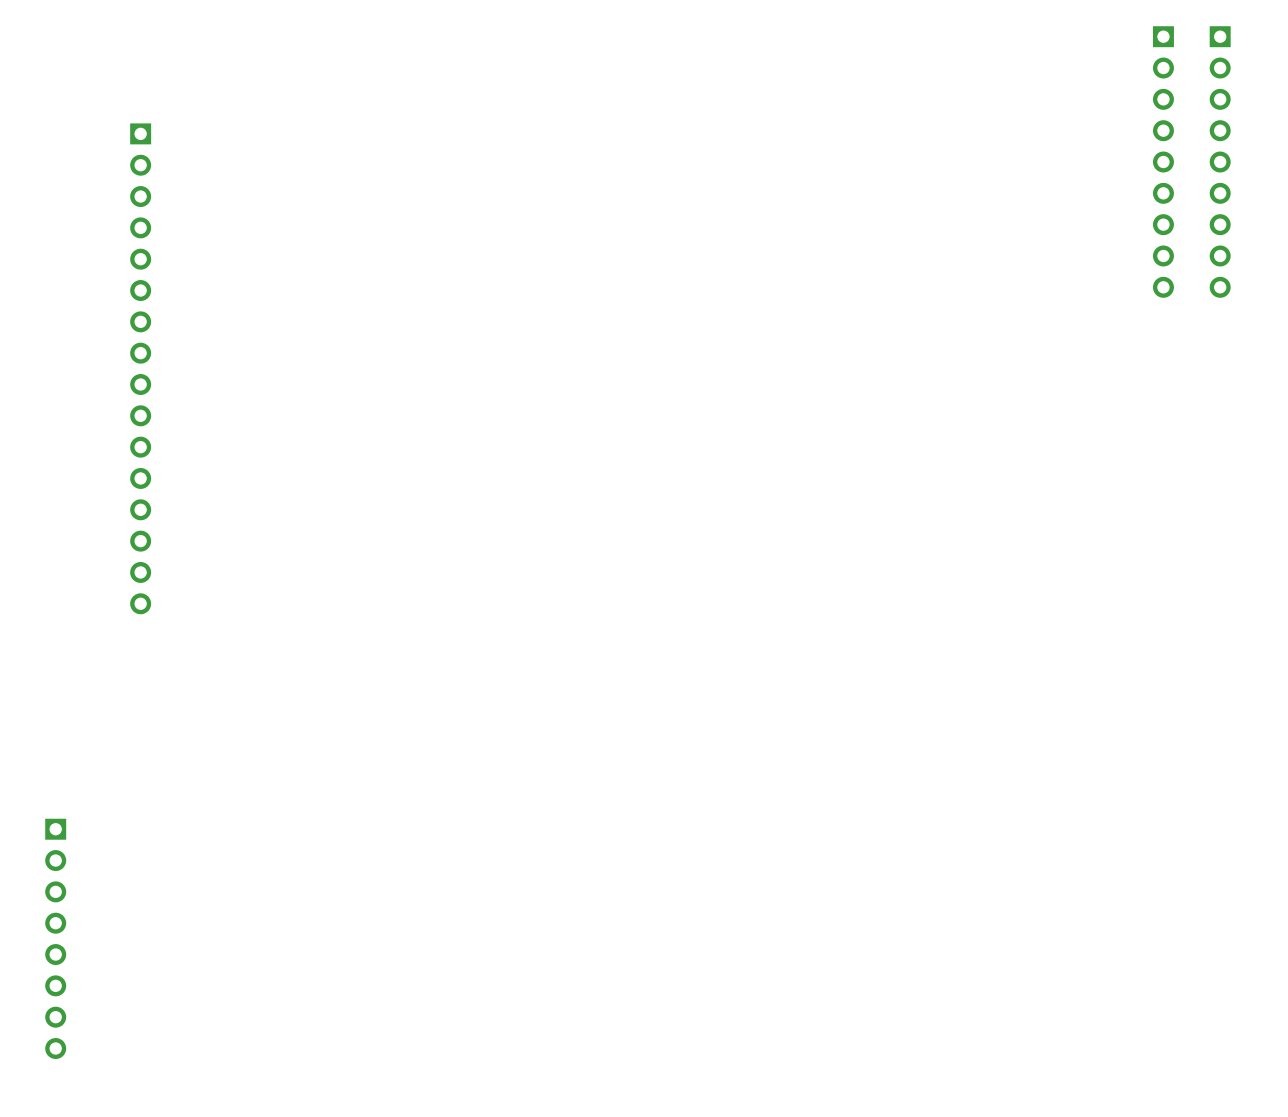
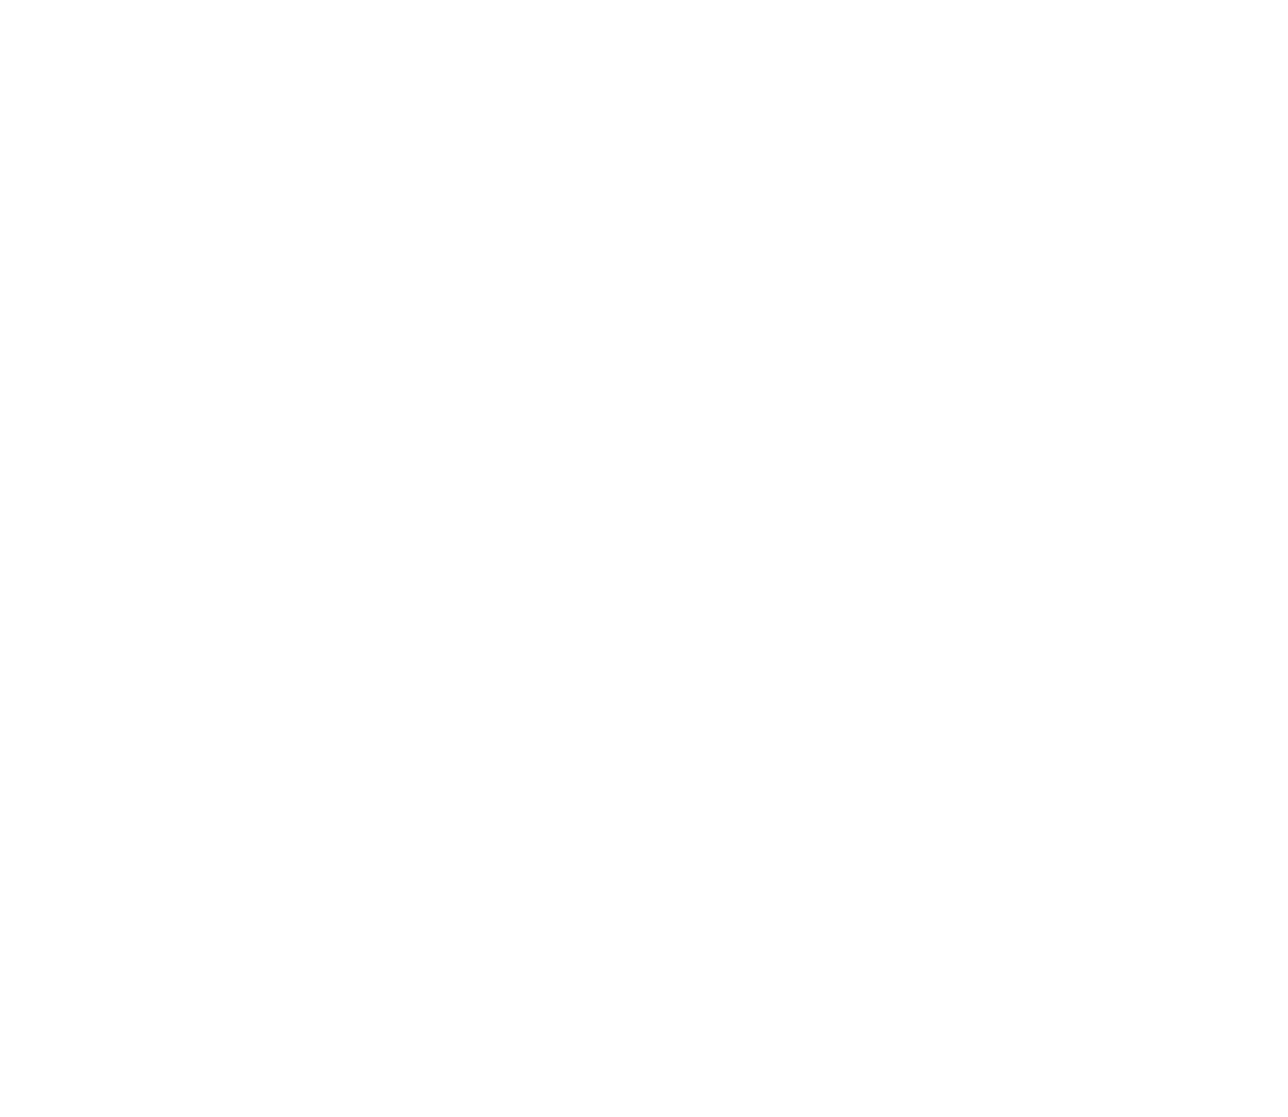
part: (1163, 162) -> none
part: (1220, 162) -> none
part: (140, 368) -> none
part: (55, 938) -> none

